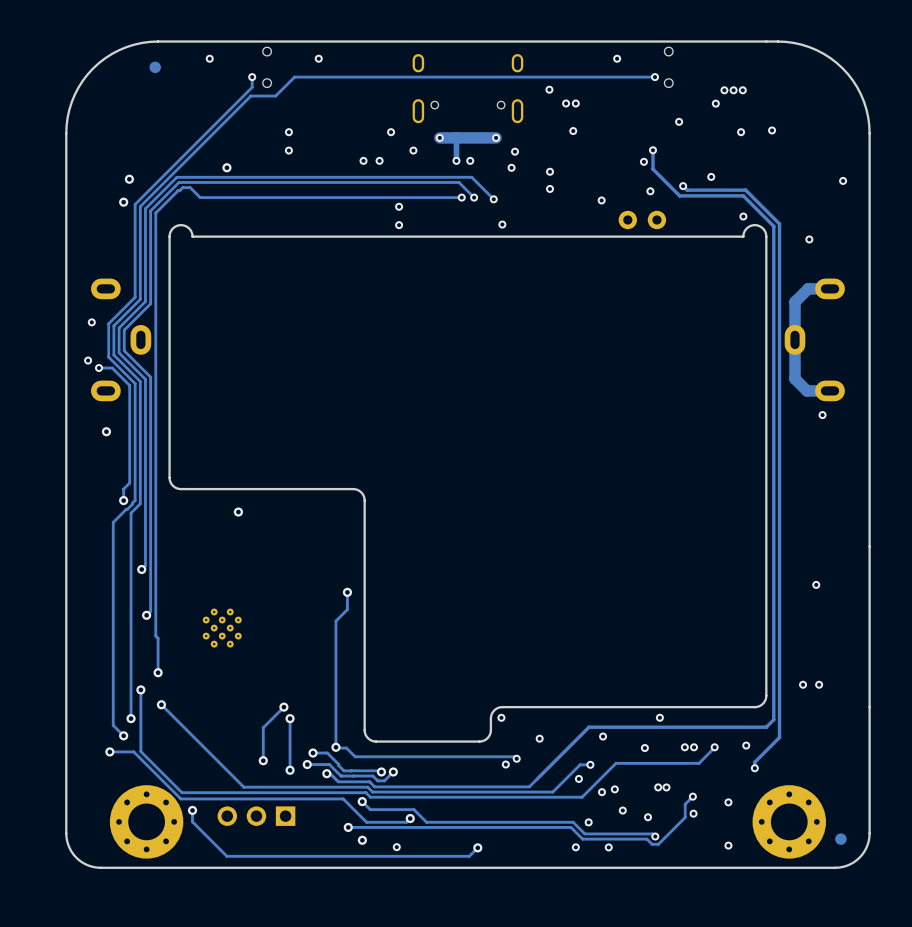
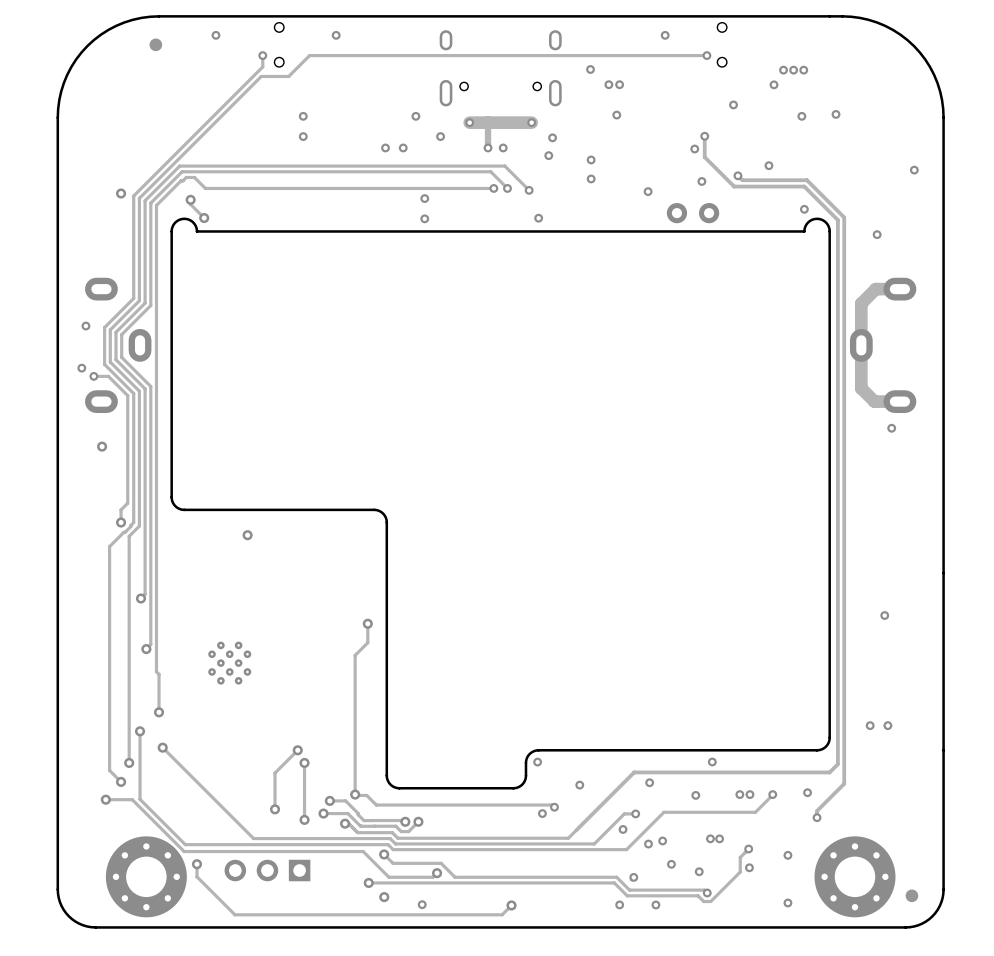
via: (226, 167) -> none
via: (129, 179) -> none
track: none -> (190, 199) (190, 204) (204, 218)
via: none -> (190, 199)
via: none -> (204, 218)

